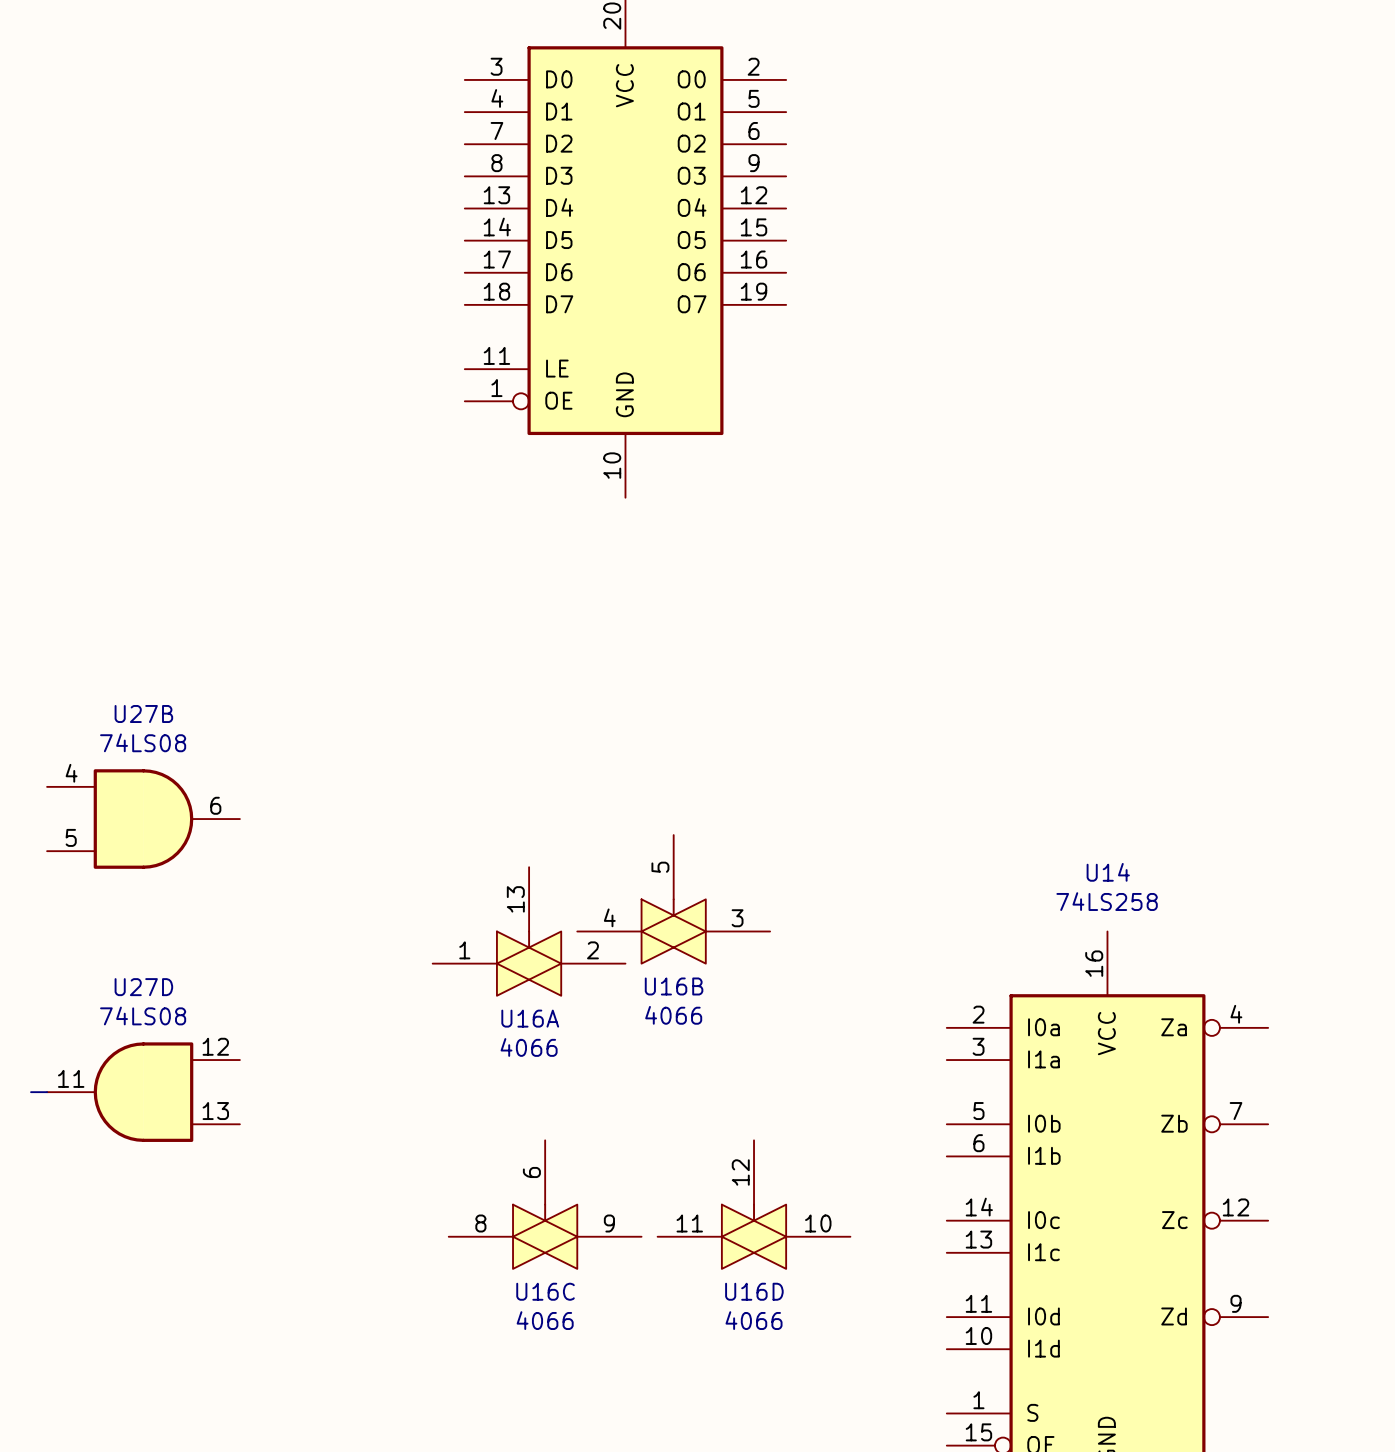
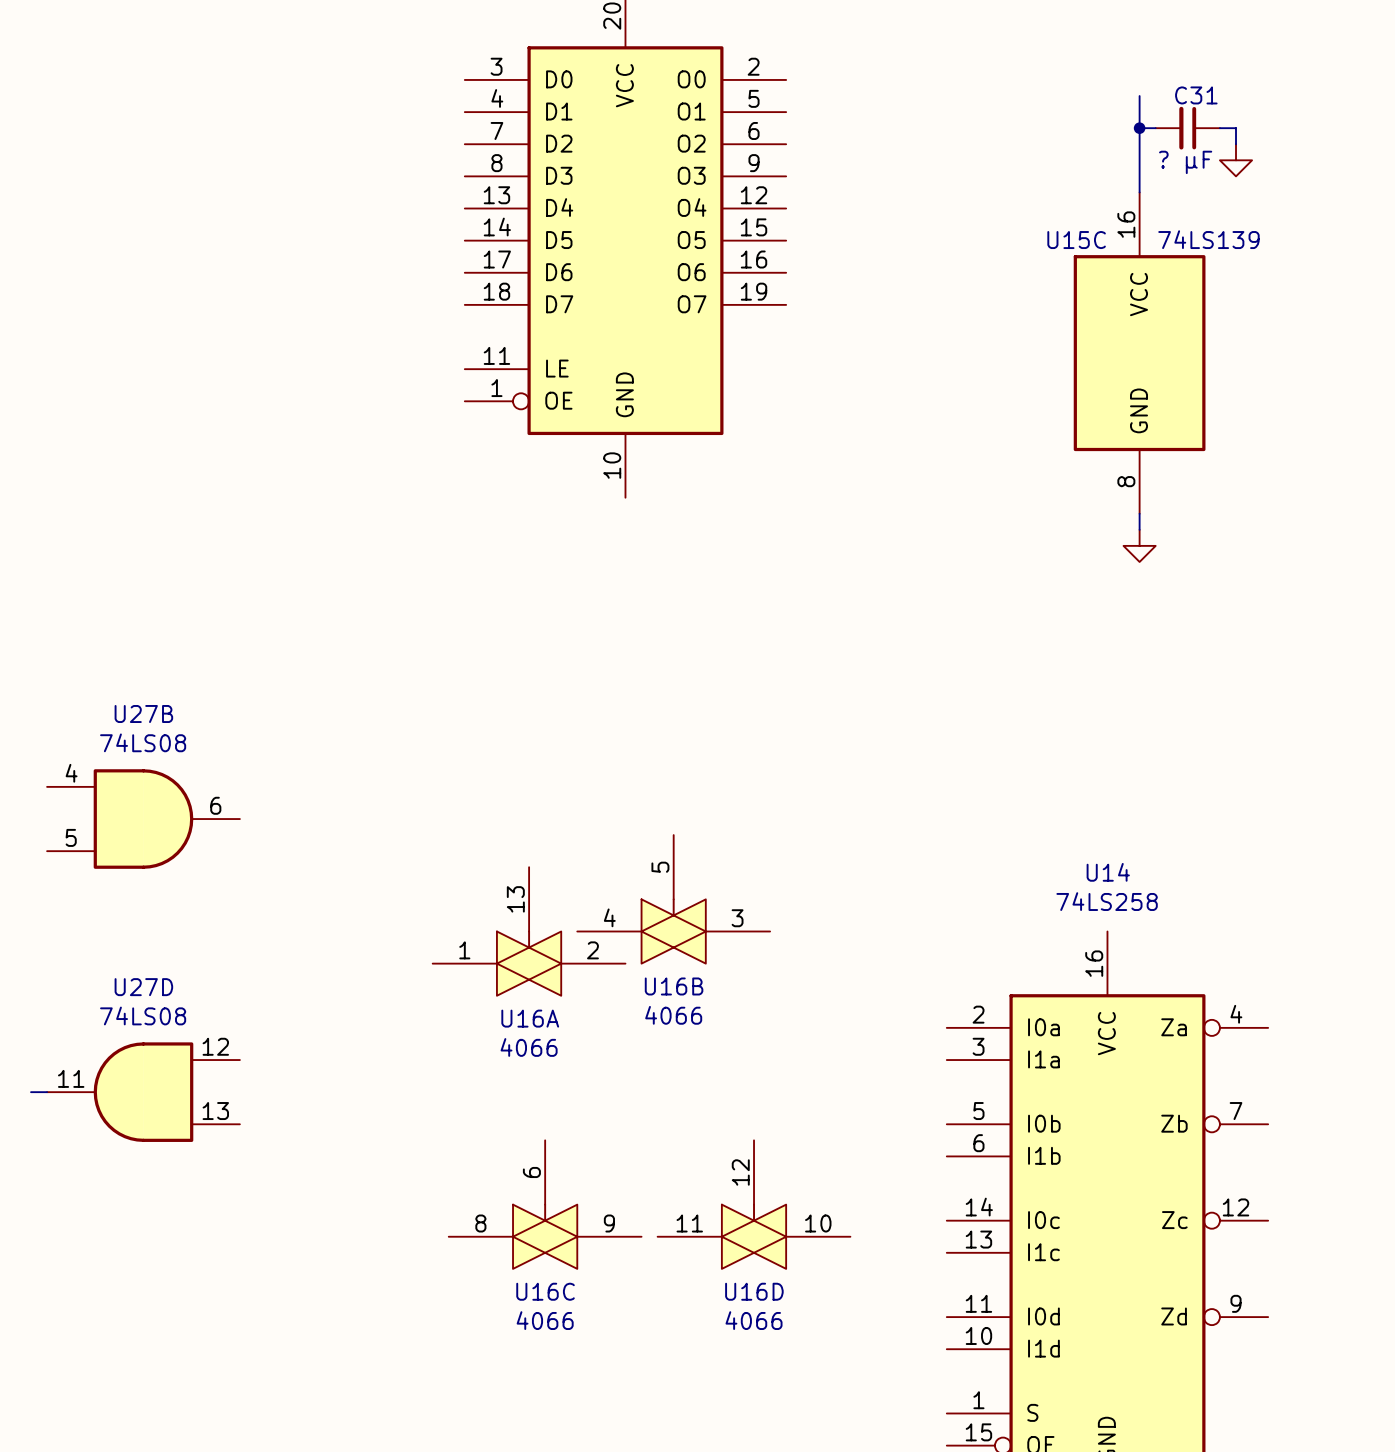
wire: none -> (1139, 96) (1139, 192)
wire: none -> (1139, 128) (1155, 128)
junction: none -> (1139, 128)
C31: none -> ? μF (1187, 128)
wire: none -> (1219, 128) (1236, 128) (1236, 144)
power symbol: none -> (1236, 160)
U15C: none -> 74LS139 (1139, 353)
wire: none -> (1139, 513) (1139, 529)
power symbol: none -> (1139, 545)

